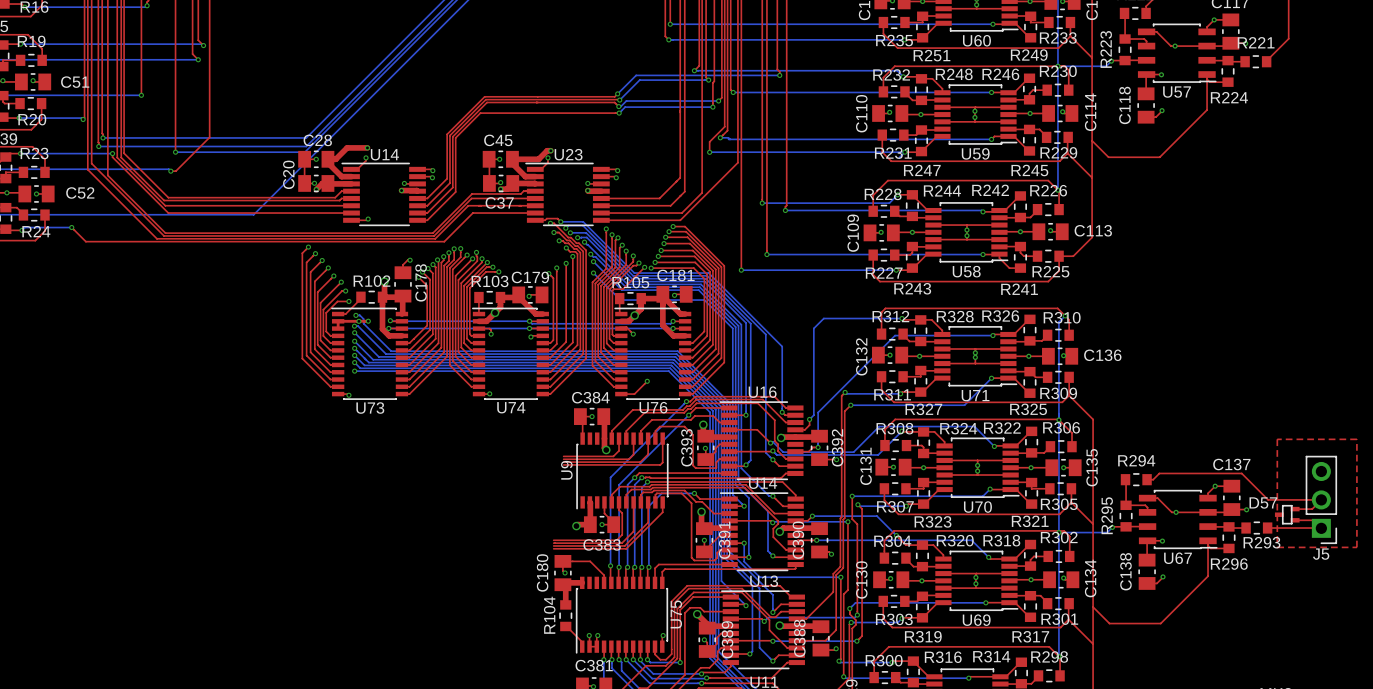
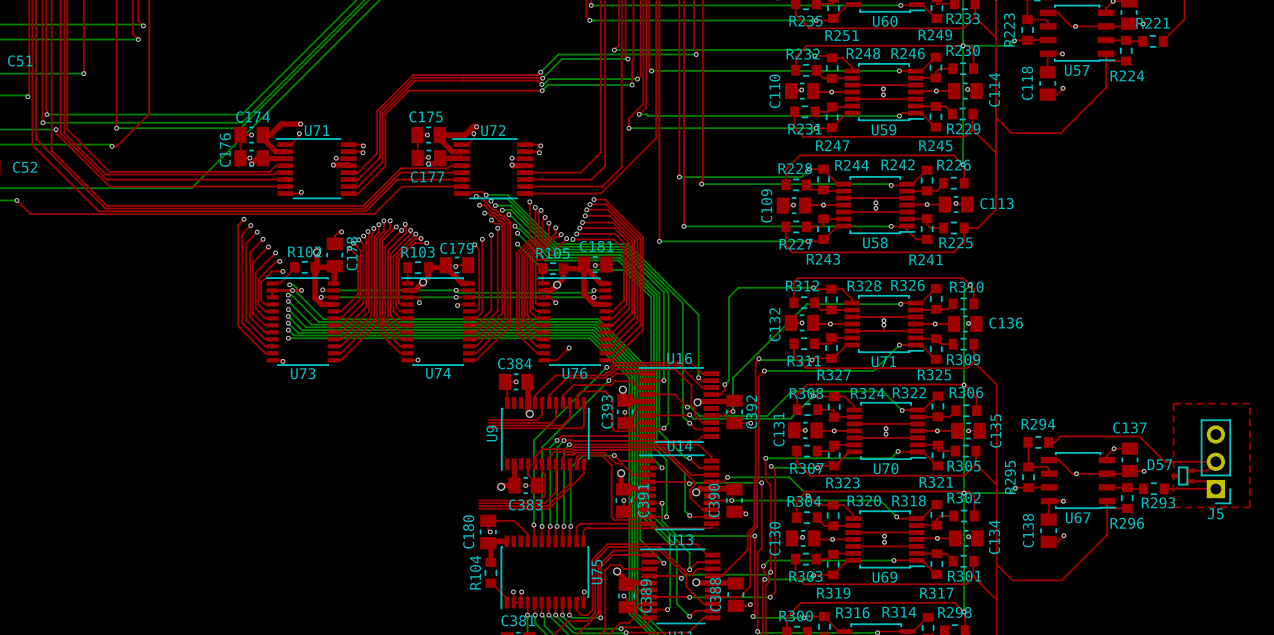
C28 name: C28 (317, 140) -> C174 (253, 116)
C45 name: C45 (498, 140) -> C175 (426, 116)
U14 name: U14 (384, 154) -> U71 (317, 130)
U23 name: U23 (568, 154) -> U72 (493, 130)
C20 name: C20 (288, 174) -> C176 (225, 149)
C37 name: C37 (499, 202) -> C177 (427, 176)

